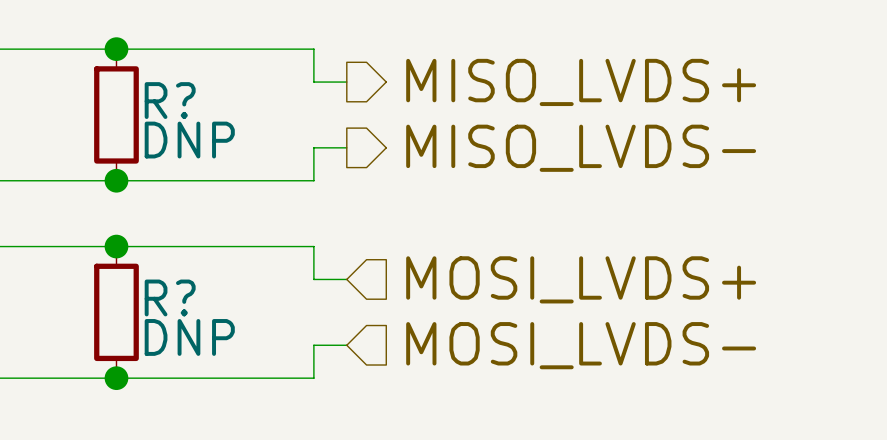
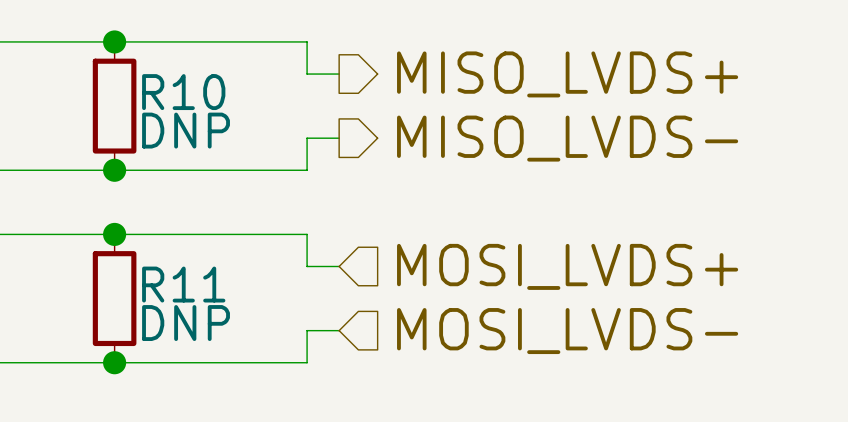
R? name: R? (170, 100) -> R10 (183, 92)
R? name: R? (170, 297) -> R11 (183, 284)

